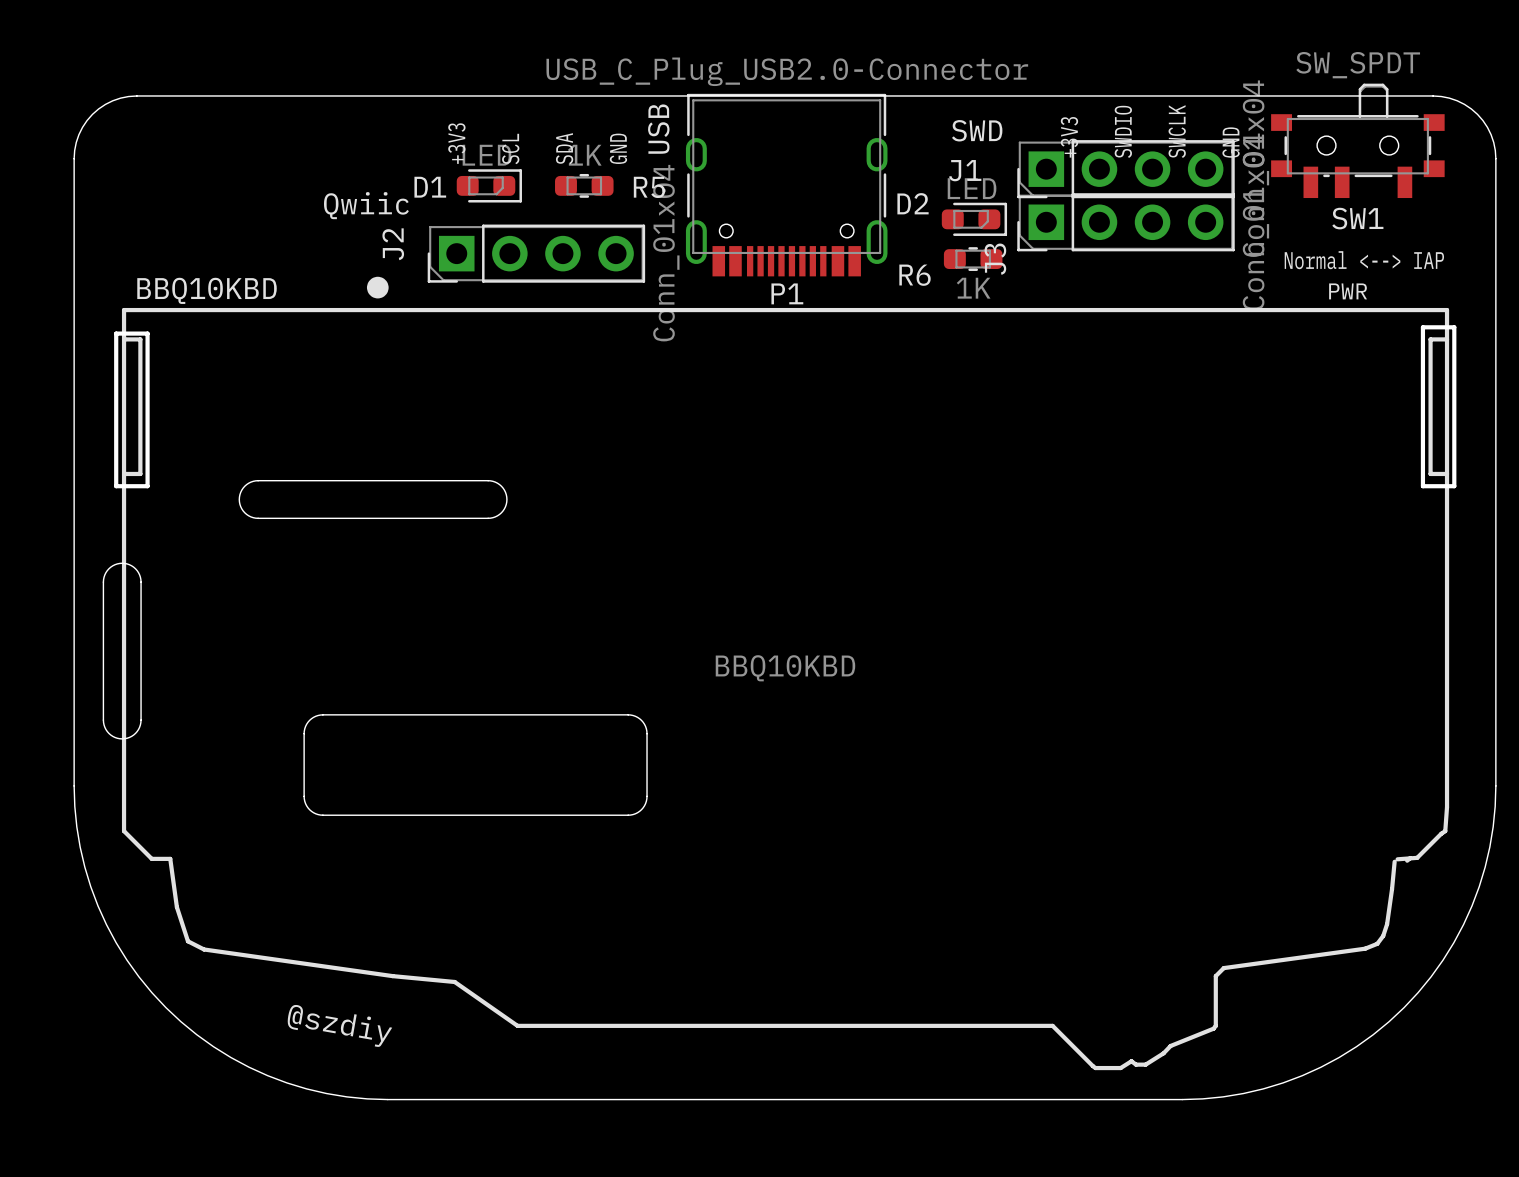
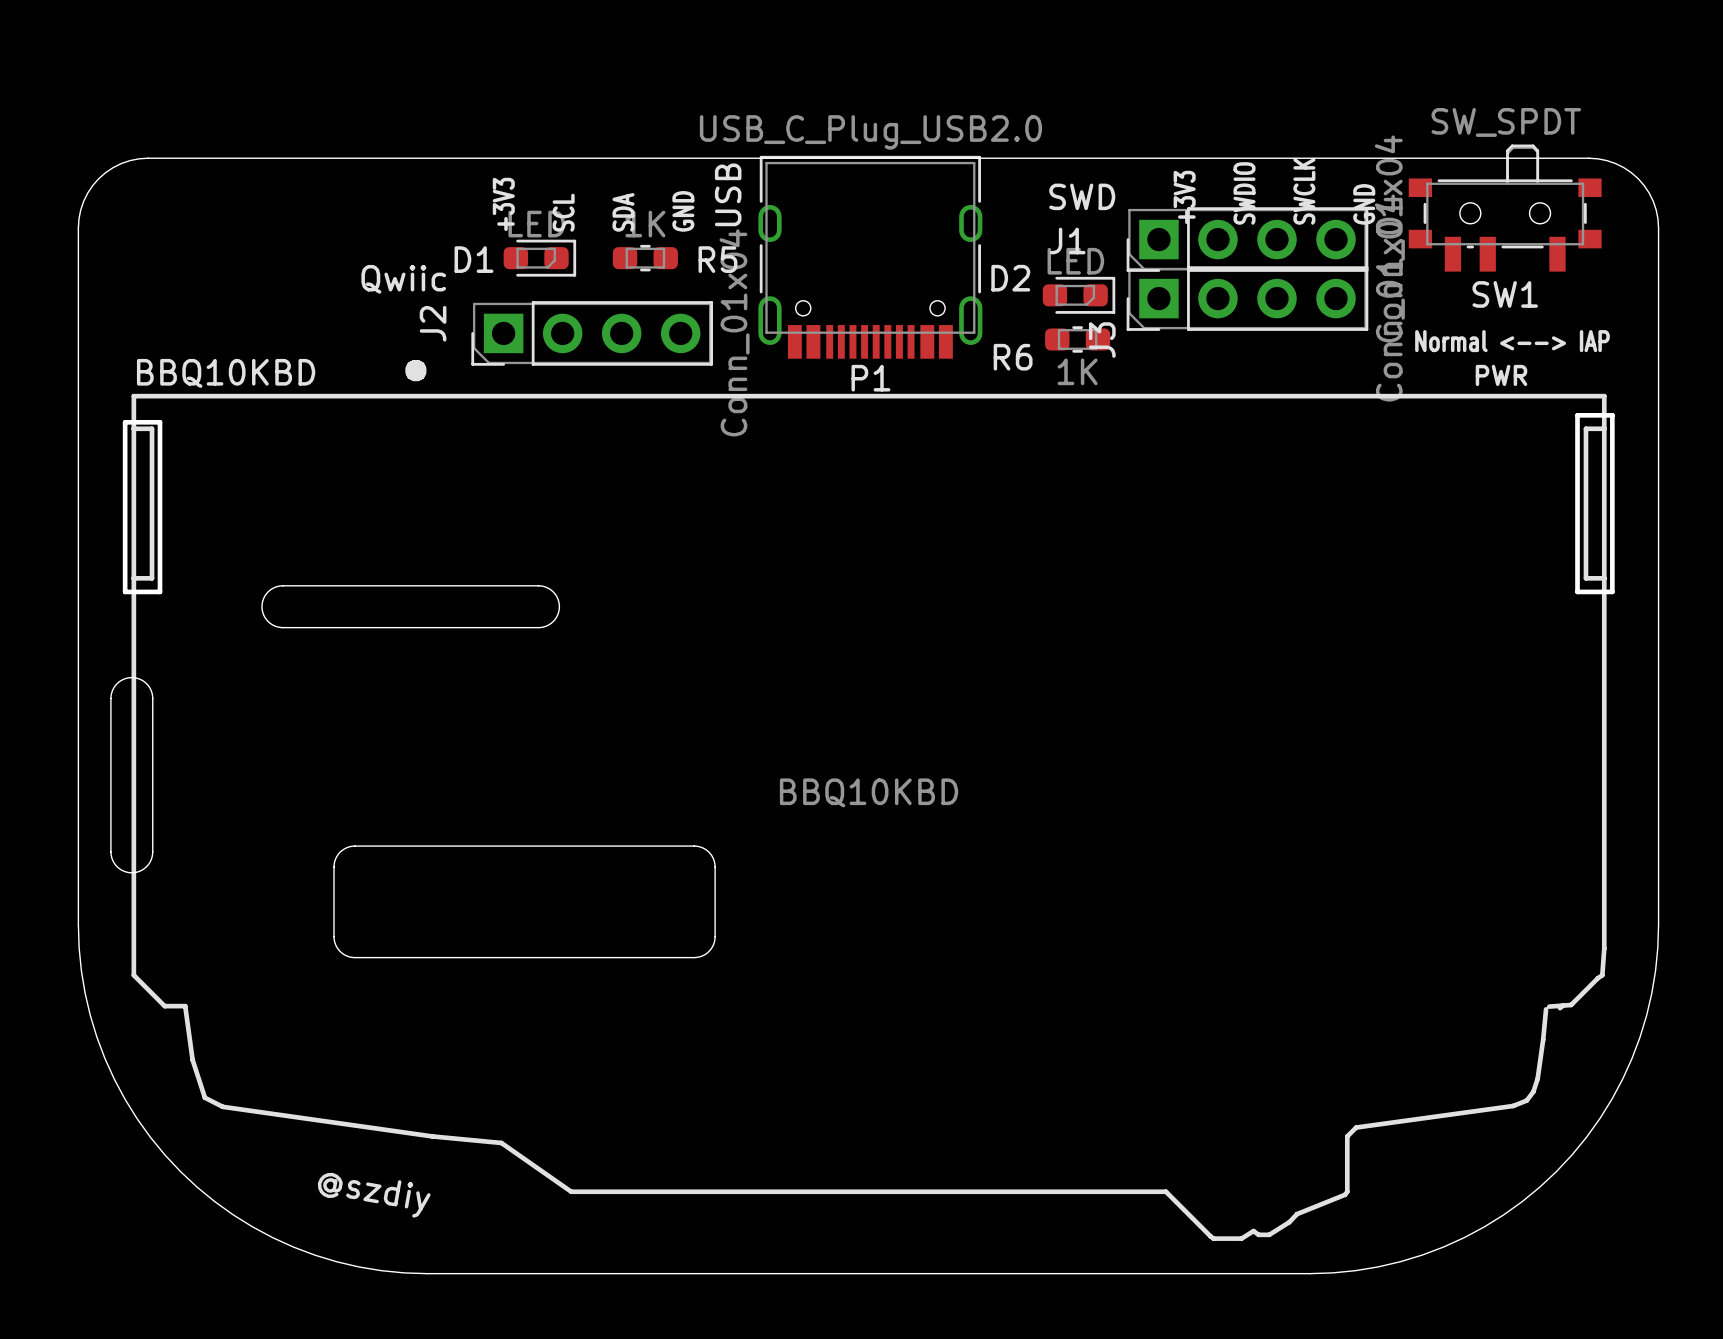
P1 value: USB_C_Plug_USB2.0-Connector (787, 71) -> USB_C_Plug_USB2.0 (870, 132)

